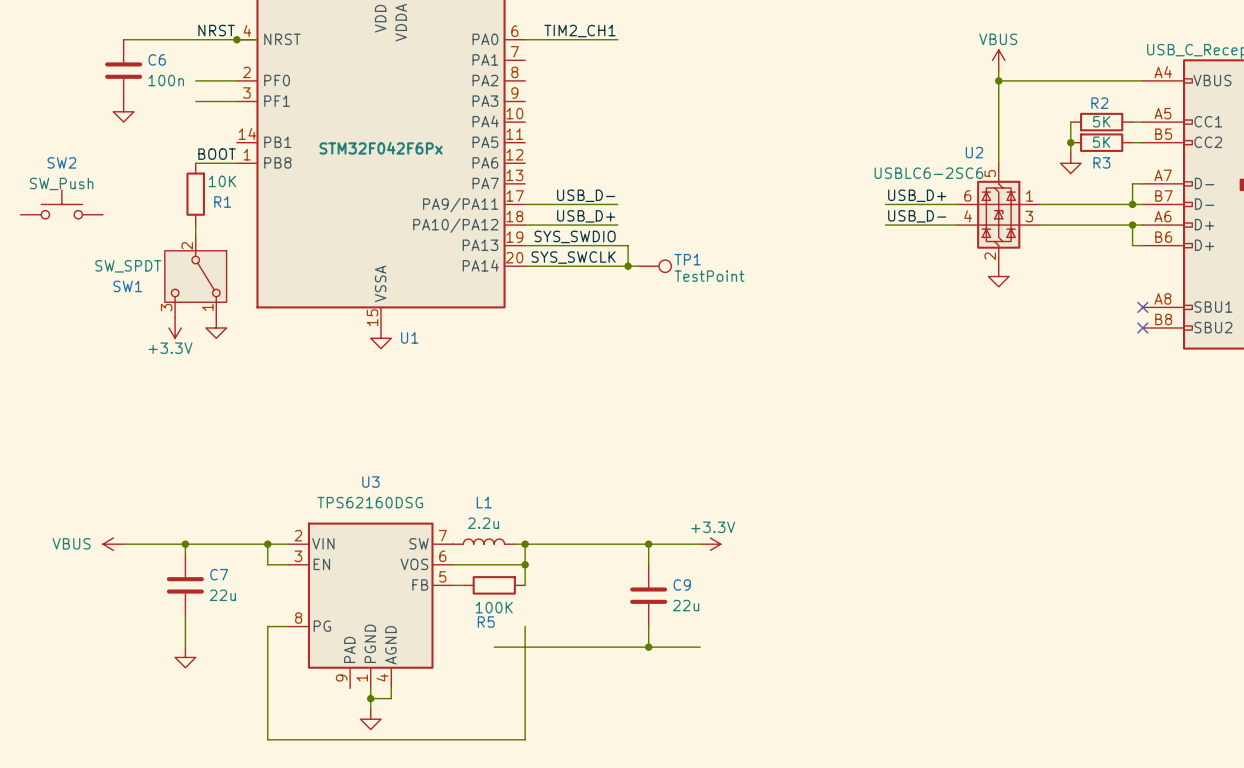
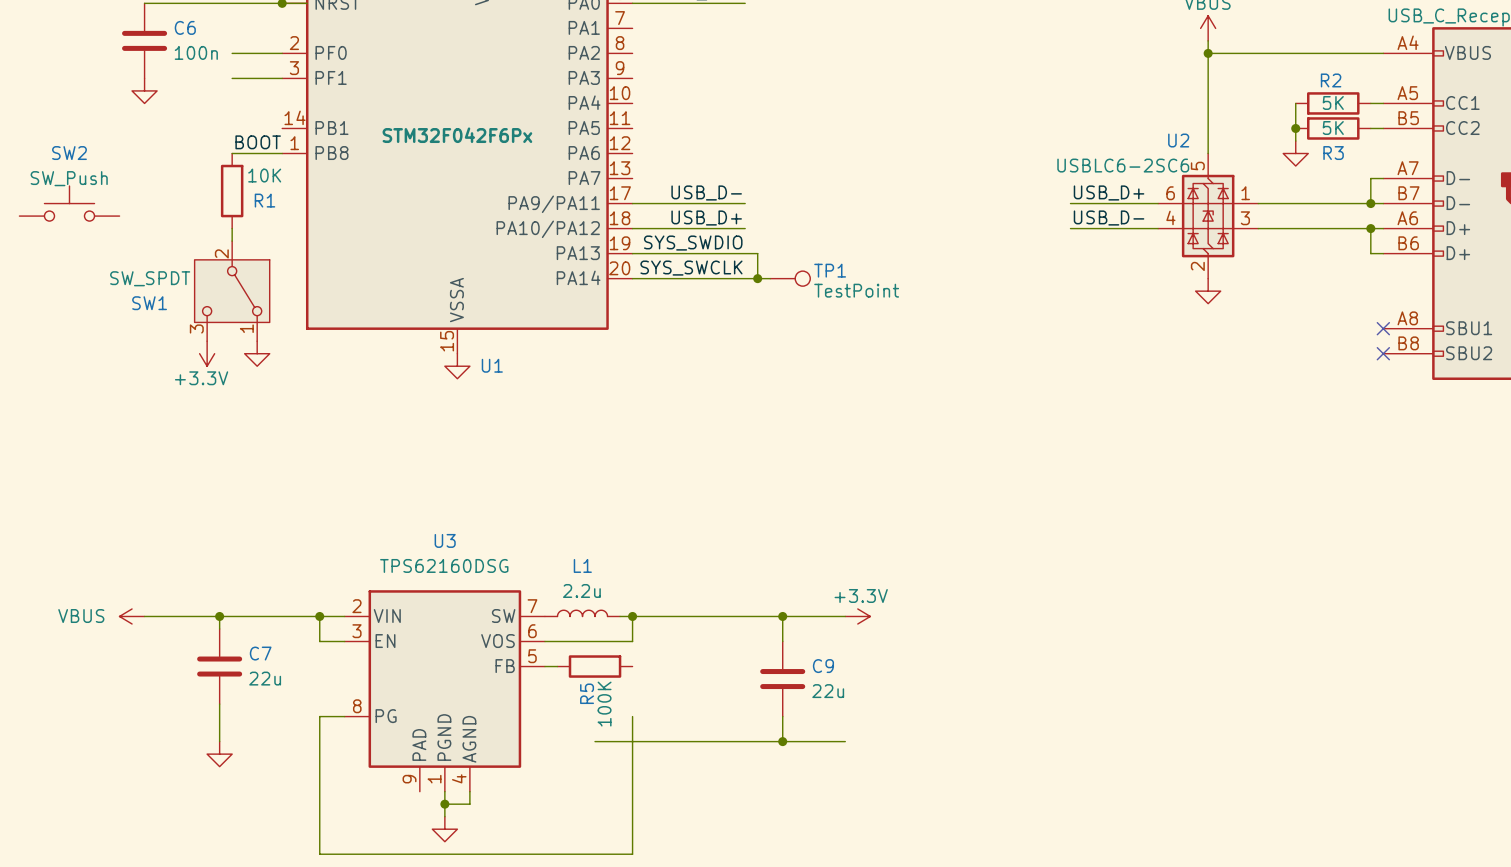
wire: (525, 564) (525, 585) -> none
junction: (525, 564) -> none
R5 value rotation: 0° (494, 607) -> 90° counterclockwise (604, 704)
R5 name rotation: 0° (486, 622) -> 90° counterclockwise (587, 693)

